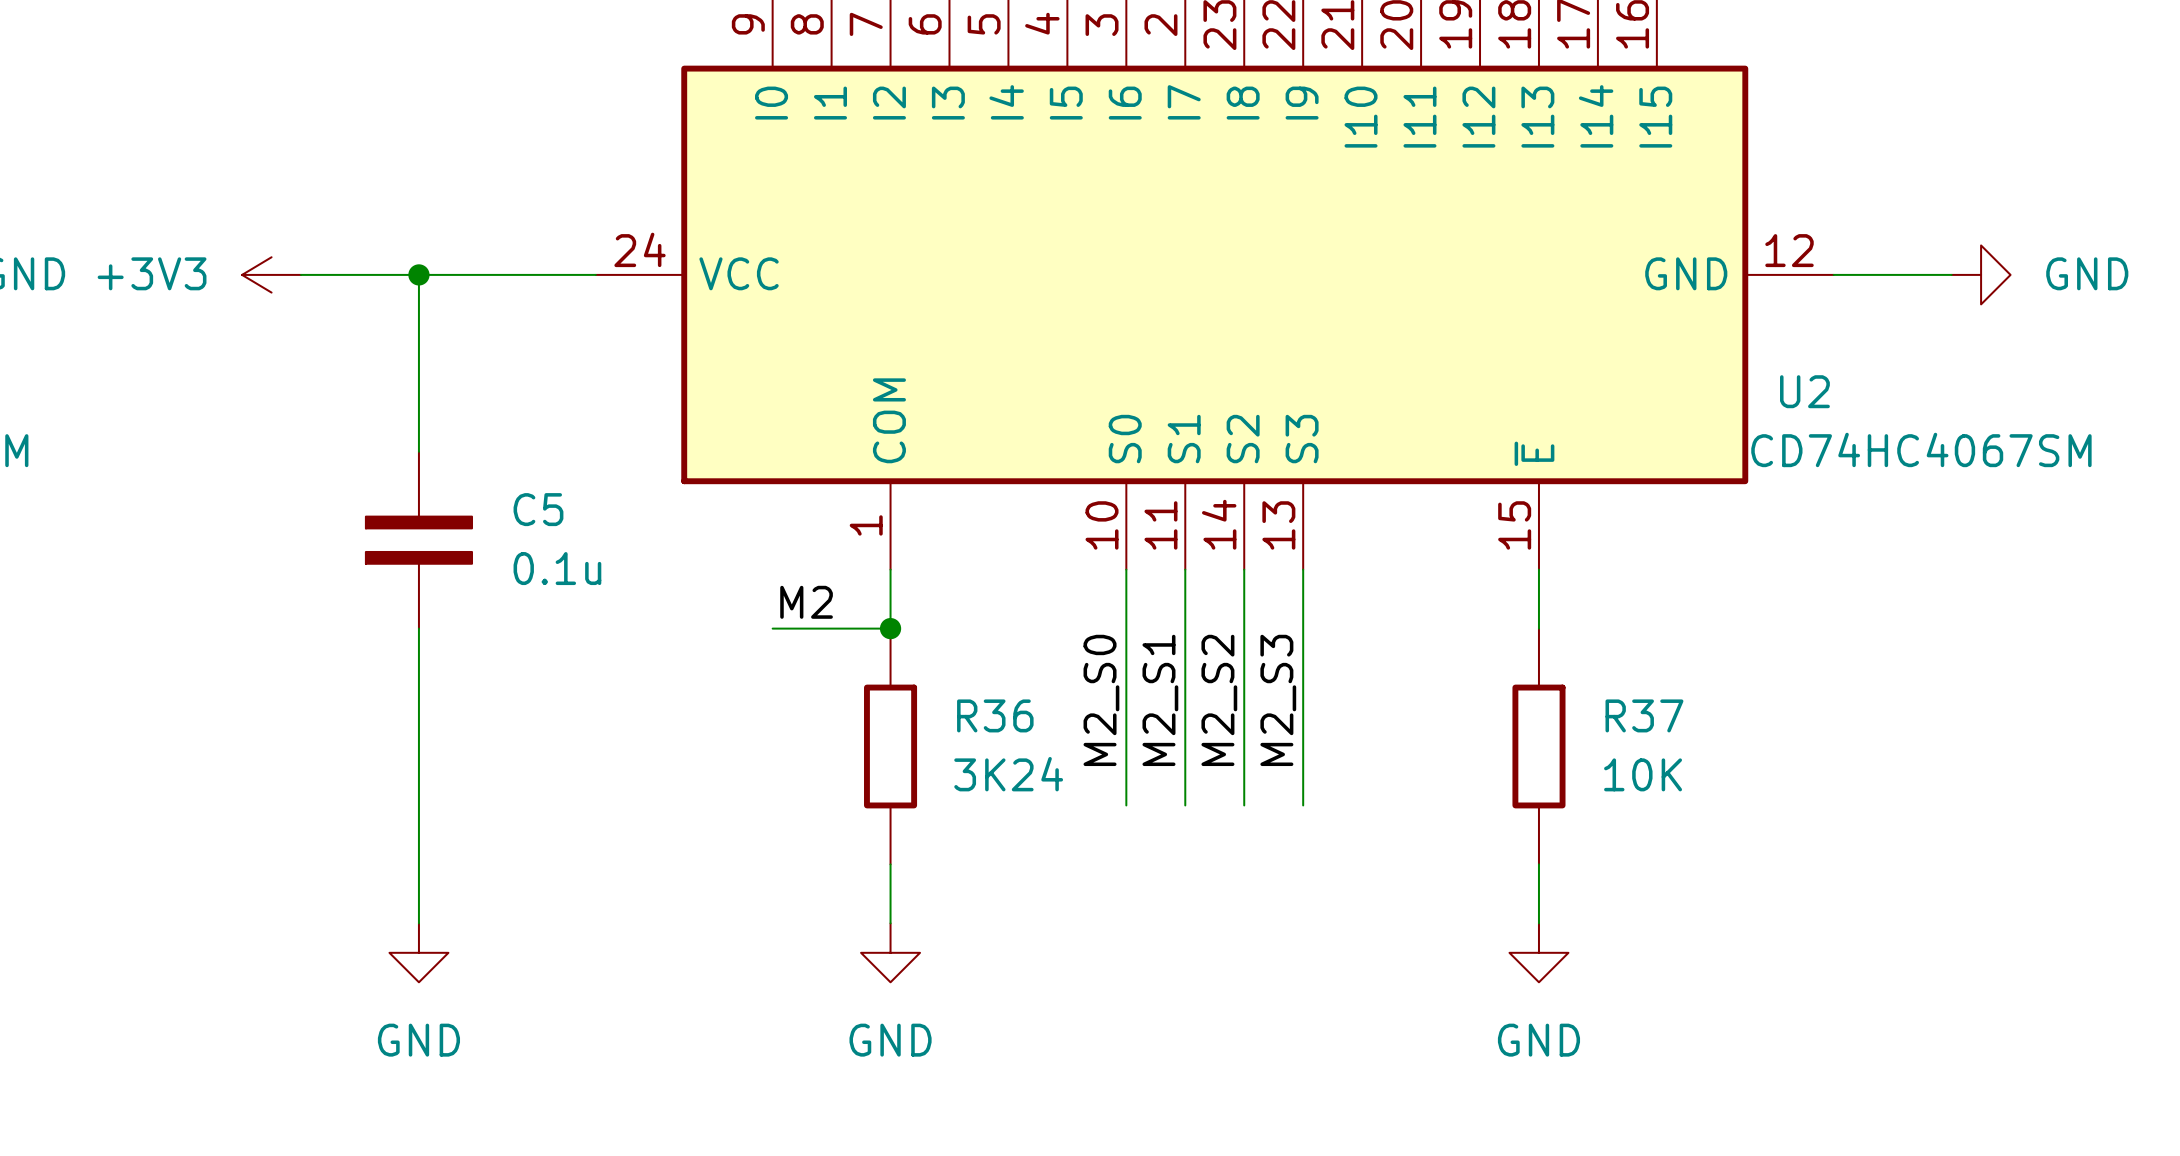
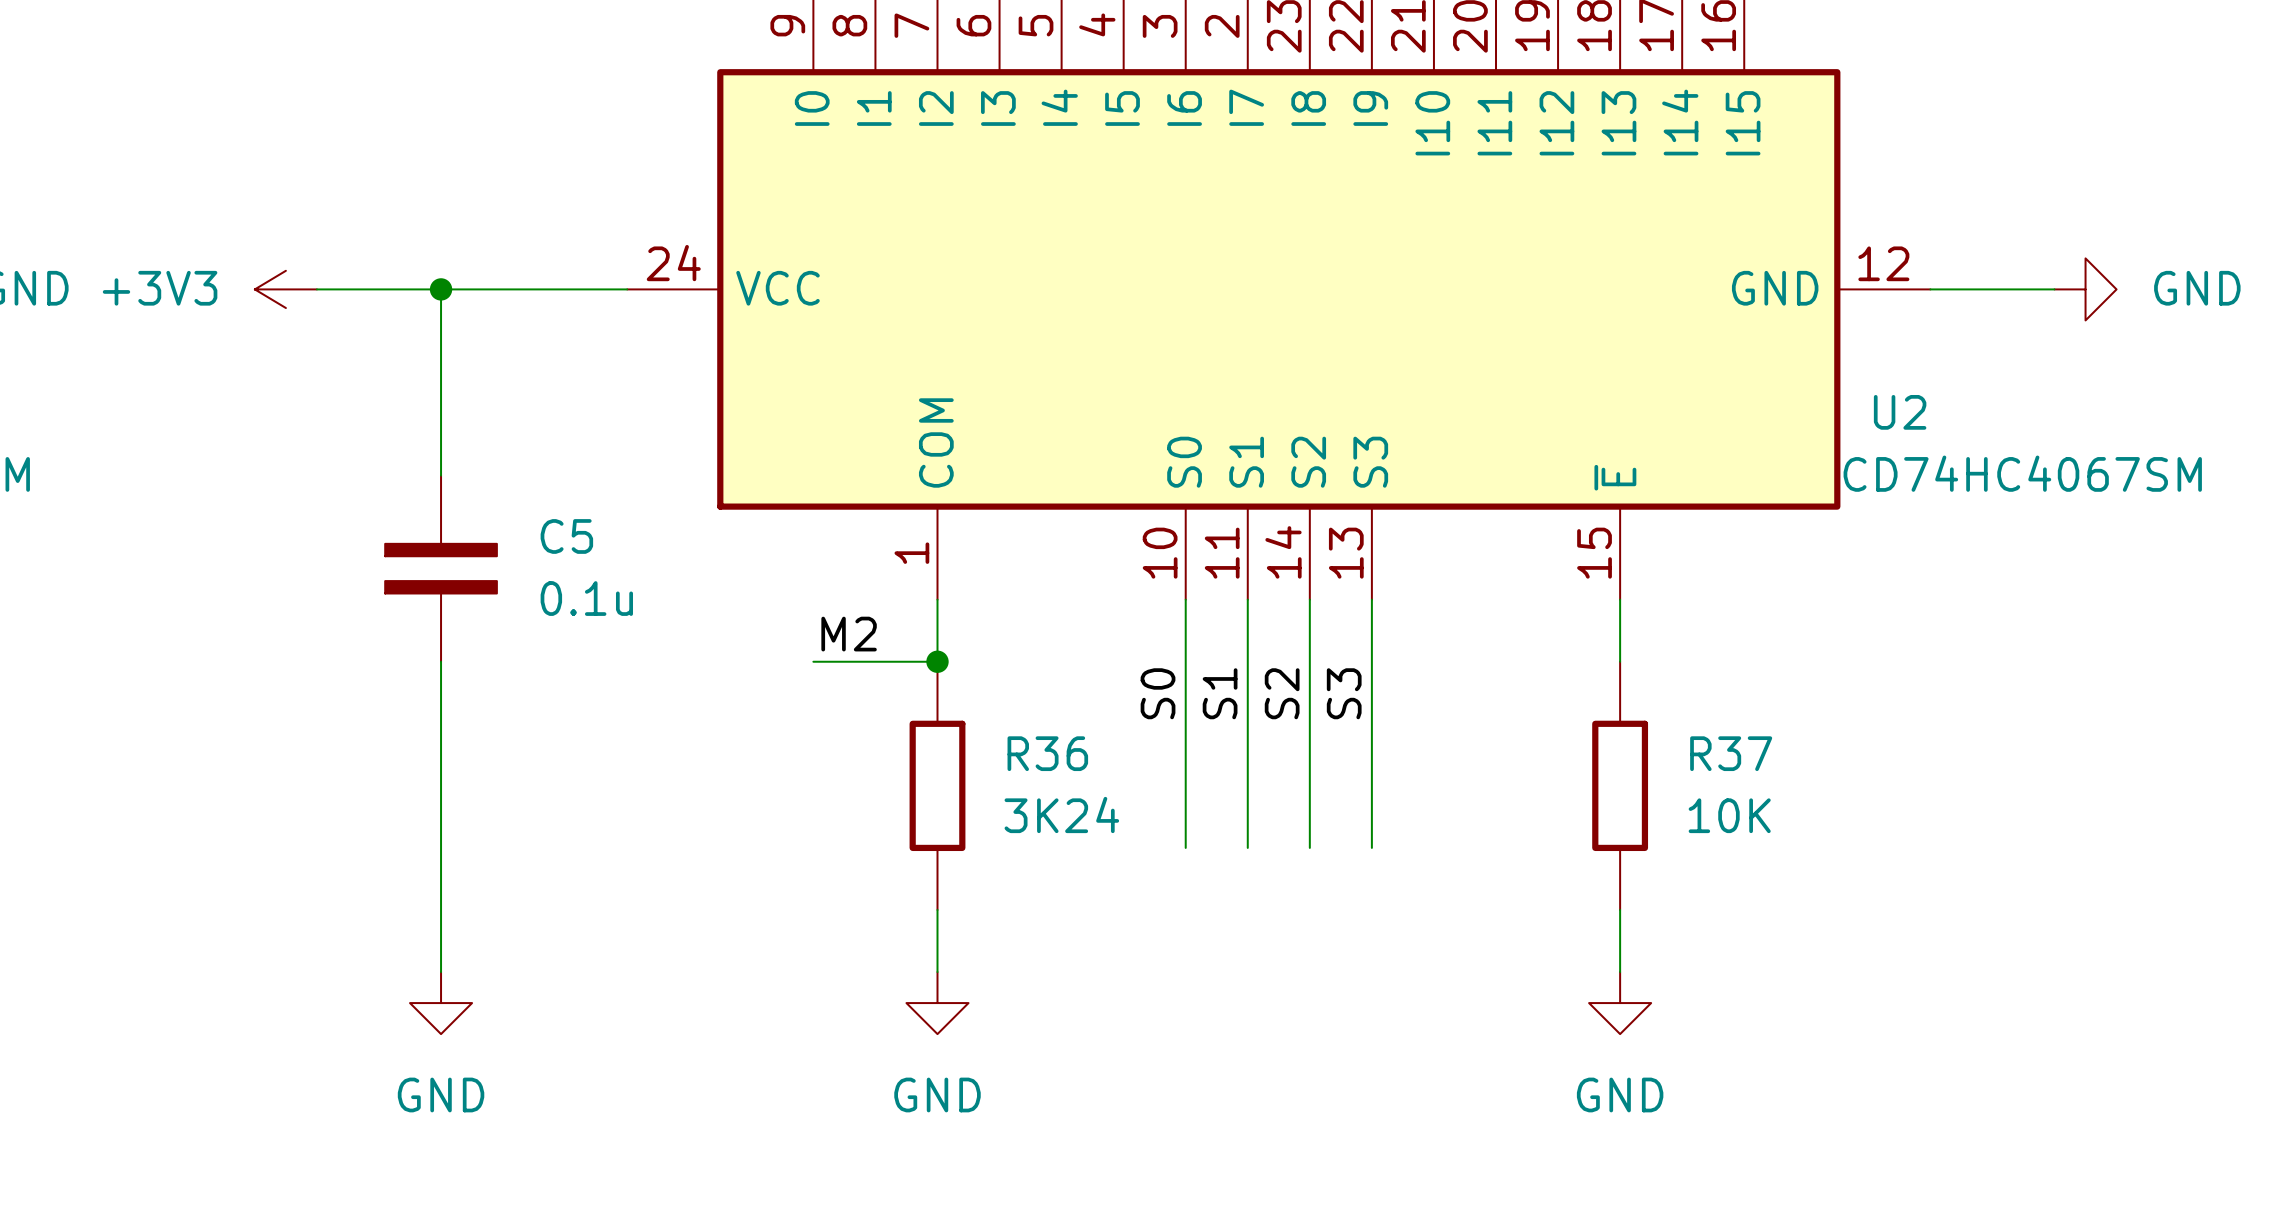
label: M2_S0 (1101, 700) -> S0 (1158, 693)
label: M2_S1 (1160, 700) -> S1 (1220, 693)
label: M2_S2 (1219, 700) -> S2 (1282, 693)
label: M2_S3 (1278, 700) -> S3 (1344, 693)

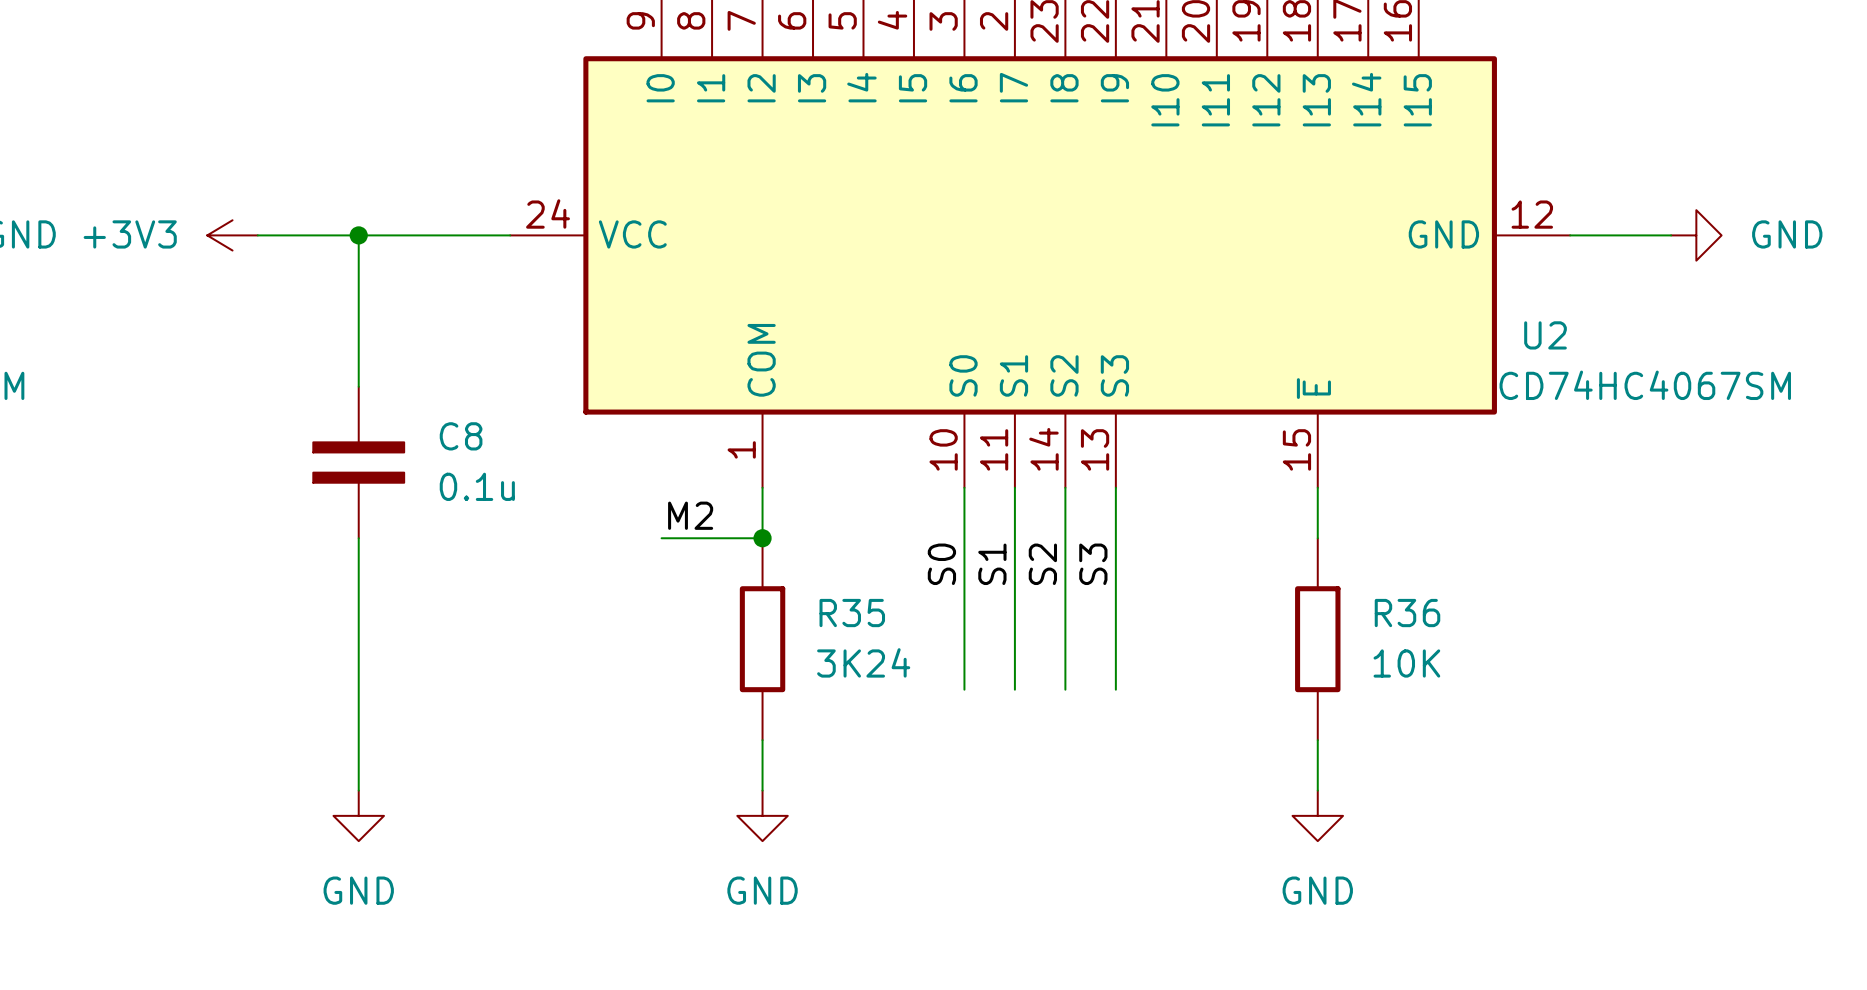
C5 name: C5 (566, 536) -> C8 (461, 436)
R36 name: R36 (1047, 753) -> R35 (852, 613)
R37 name: R37 (1731, 753) -> R36 (1407, 613)

